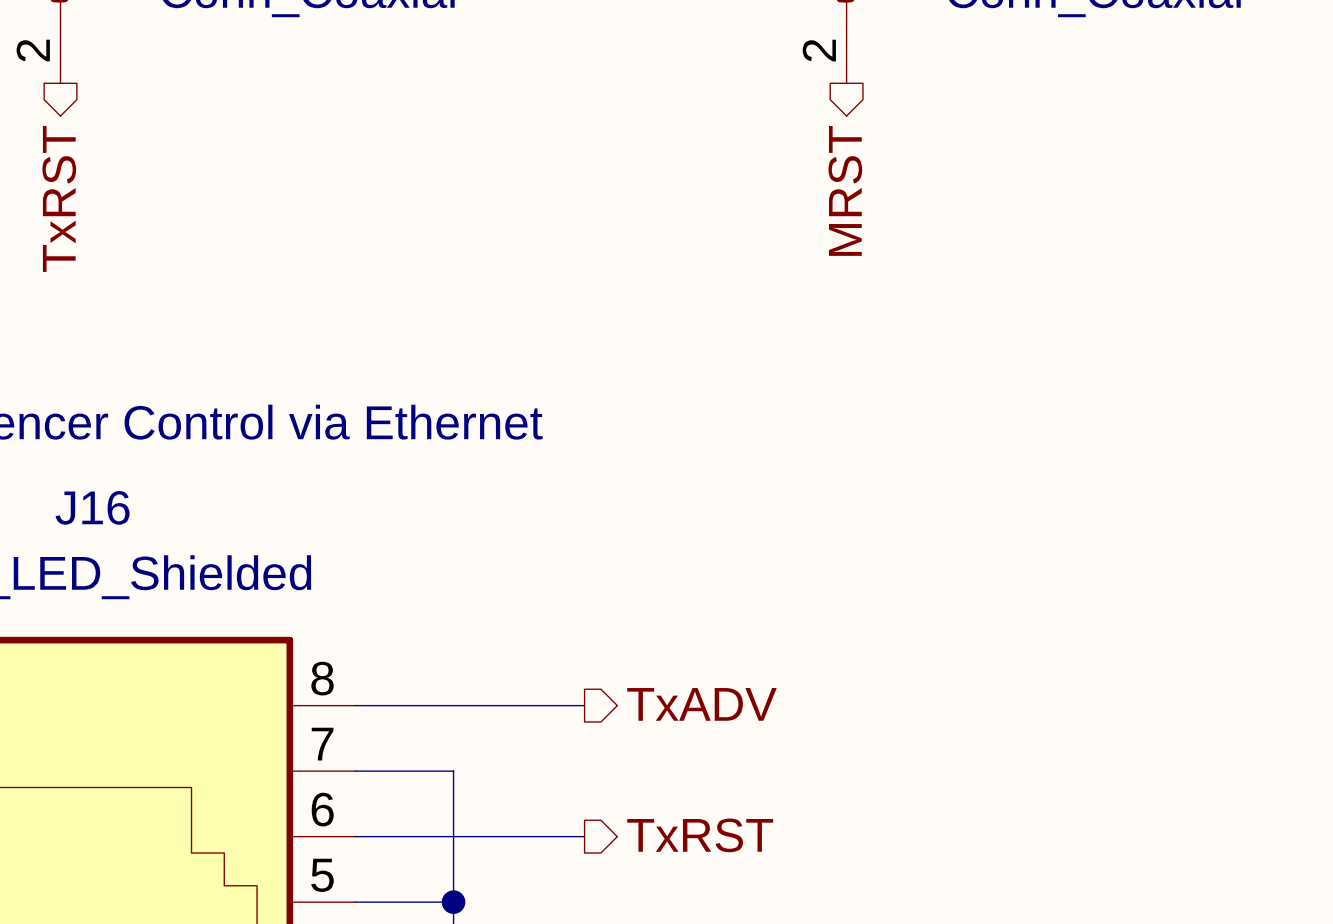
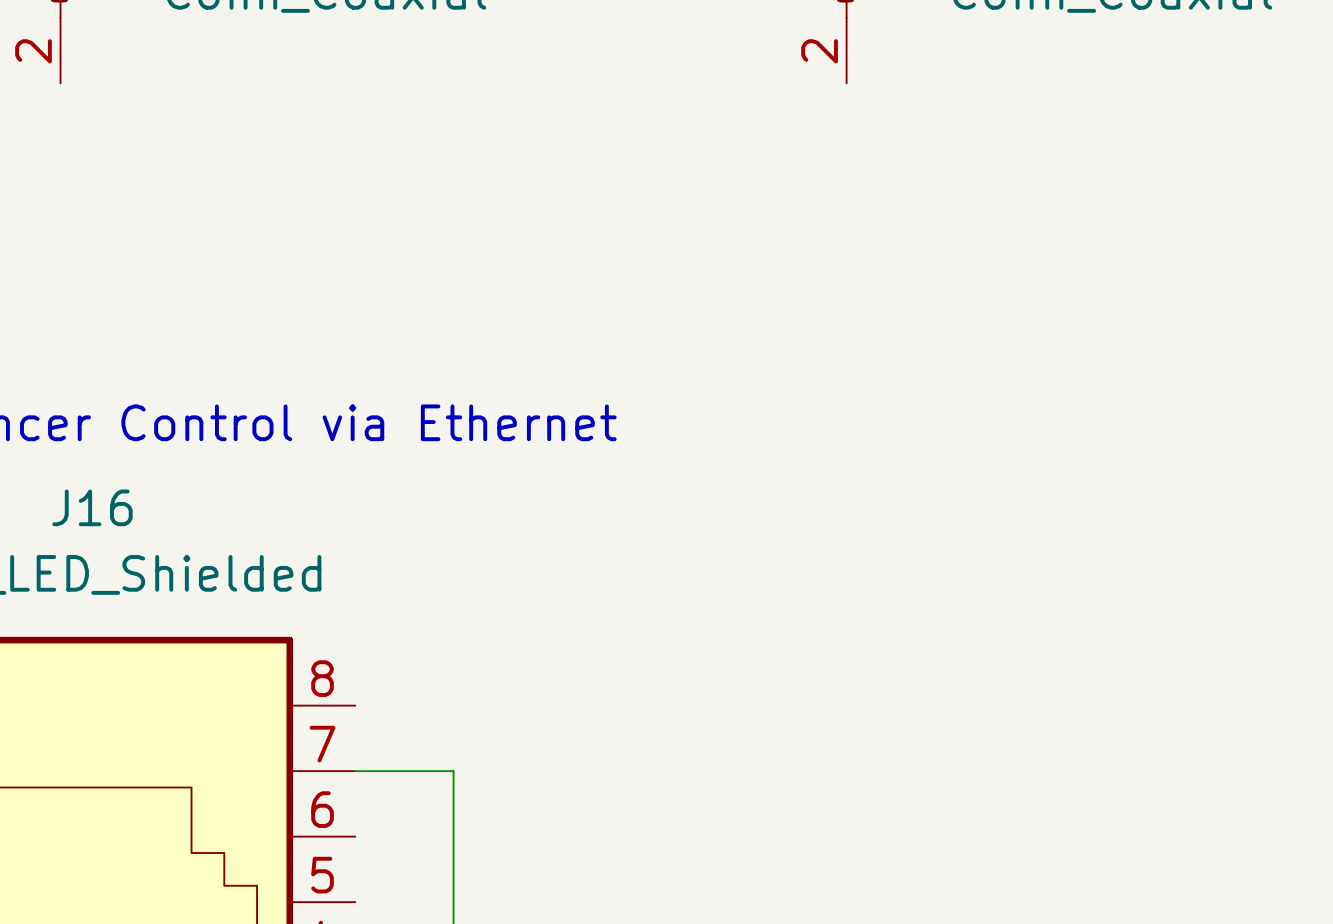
hierarchical label: MRST (845, 190) -> none
hierarchical label: TxRST (59, 198) -> none
hierarchical label: TxADV (701, 704) -> none
wire: (355, 705) (584, 705) -> none
hierarchical label: TxRST (700, 835) -> none
wire: (355, 836) (584, 836) -> none
wire: (355, 902) (453, 902) -> none
junction: (453, 902) -> none

